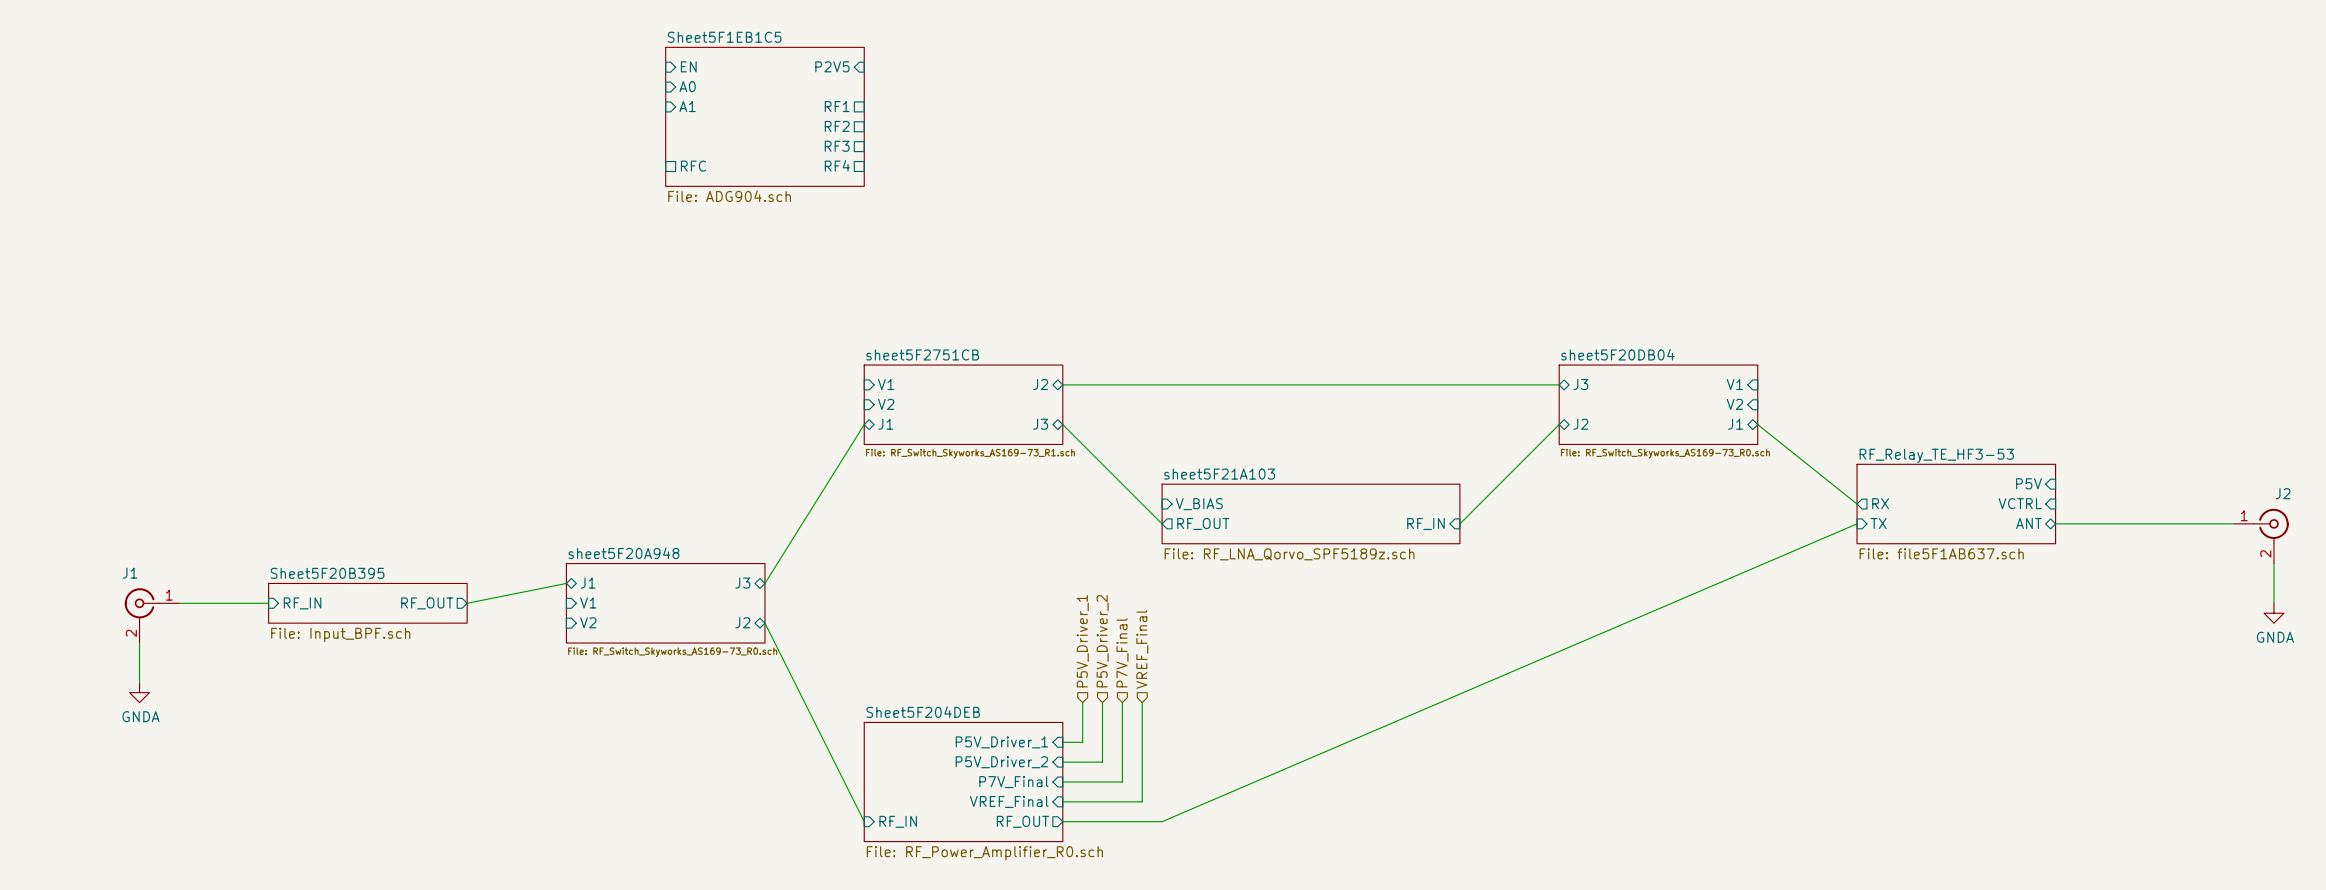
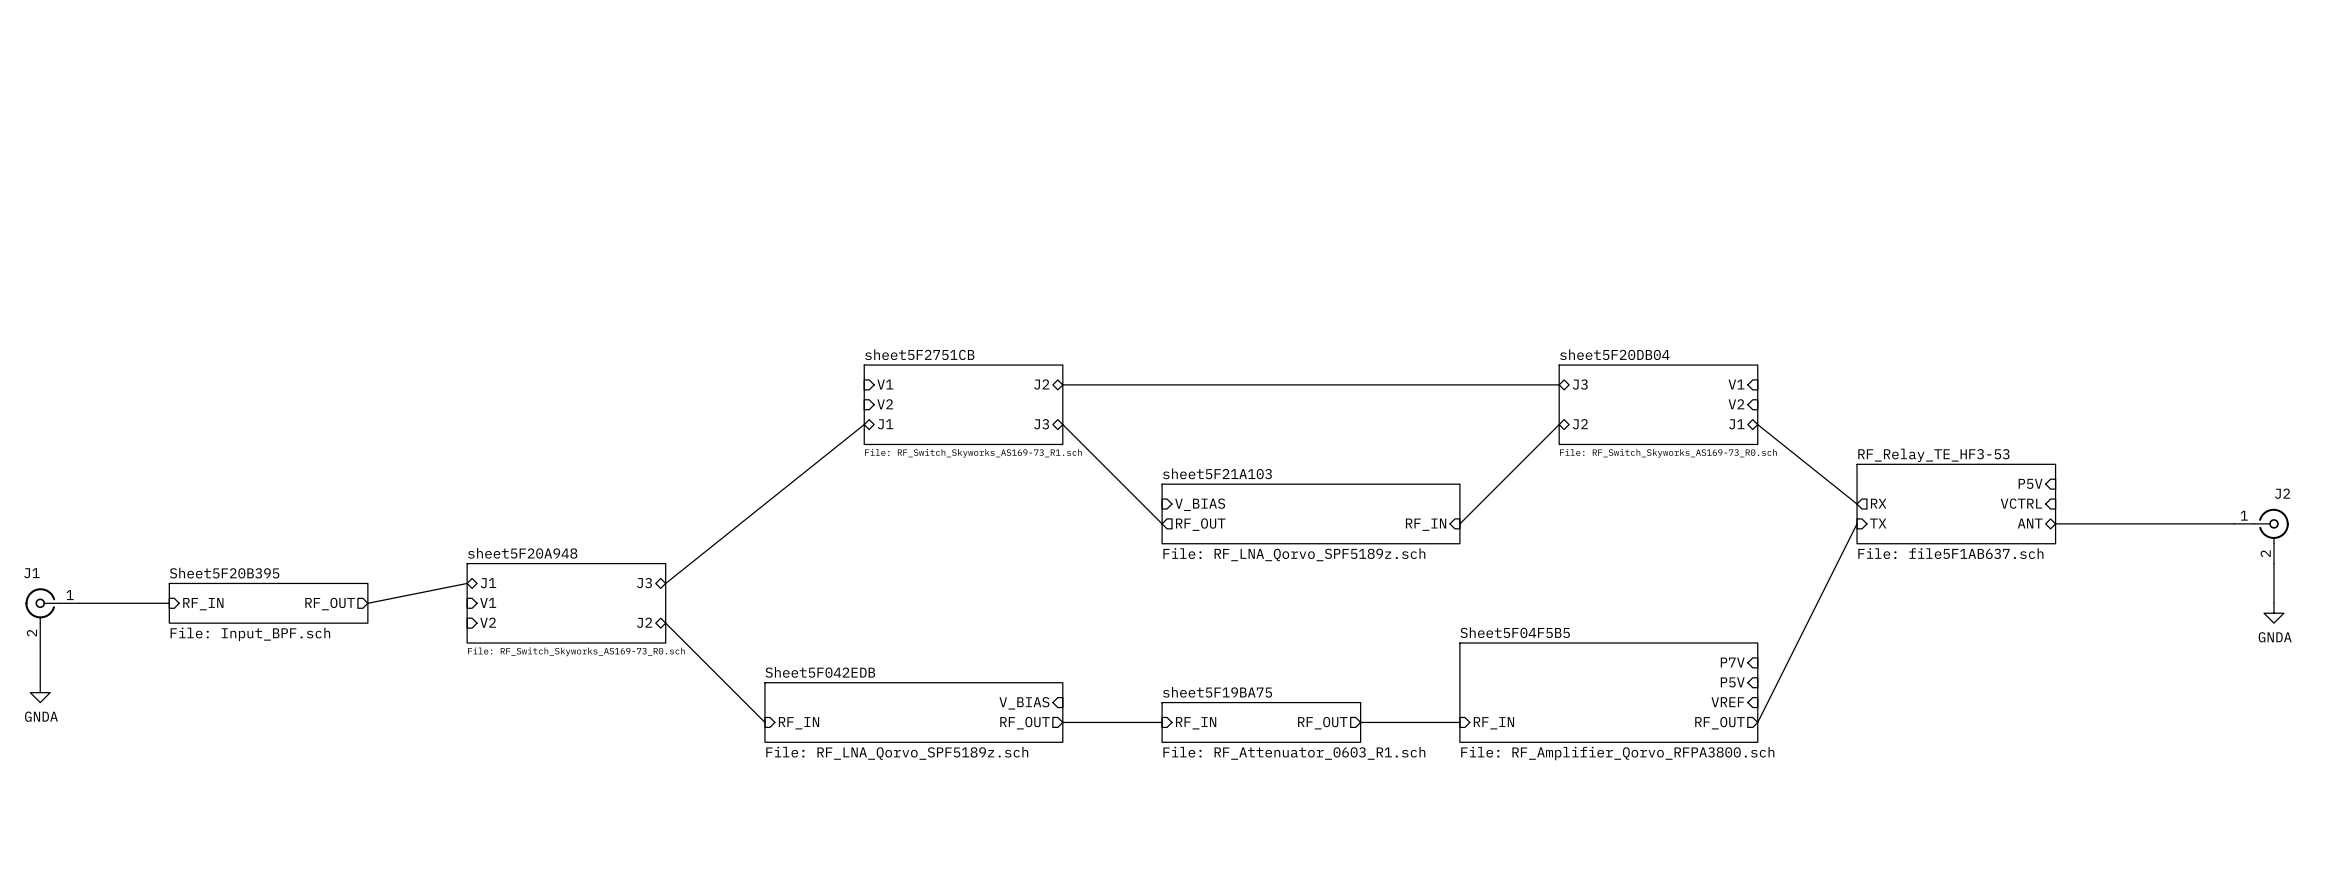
sheet pin: EN (688, 66) -> none
sheet pin: P2V5 (832, 66) -> none
sheet pin: A0 (687, 86) -> none
sheet pin: A1 (687, 106) -> none
sheet pin: RF1 (837, 106) -> none
sheet Sheet5F1EB1C5: File: ADG904.sch (764, 116) -> none
sheet pin: RF2 (837, 126) -> none
sheet pin: RF3 (837, 146) -> none
sheet pin: RF4 (837, 165) -> none
sheet pin: RFC (693, 166) -> none
wire: (864, 424) (764, 583) -> (864, 424) (665, 583)
wire: (1857, 523) (1162, 821) (1062, 821) -> (1857, 523) (1757, 722)
wire: (566, 583) (467, 603) -> (467, 583) (367, 603)
sheet pin position: J1 (588, 583) -> J1 (488, 583)
sheet pin position: J3 (742, 583) -> J3 (644, 583)
sheet pin position: V1 (588, 602) -> V1 (488, 602)
wire: (179, 603) (268, 603) -> (79, 603) (169, 603)
sheet pin position: RF_IN (302, 603) -> RF_IN (203, 604)
sheet Sheet5F20B395 position: (367, 603) -> (268, 603)
sheet pin position: RF_OUT (427, 603) -> RF_OUT (330, 604)
sheet sheet5F20A948 position: (665, 603) -> (566, 603)
J1 position: (151, 615) -> (52, 615)
sheet pin position: V2 (588, 622) -> V2 (488, 622)
sheet pin position: J2 (742, 622) -> J2 (644, 622)
wire: none -> (665, 623) (764, 722)
wire: (764, 623) (864, 821) -> none
hierarchical label: P5V_Driver_1 (1082, 641) -> none
hierarchical label: P5V_Driver_2 (1102, 641) -> none
wire: (139, 643) (139, 682) -> (40, 643) (40, 682)
hierarchical label: VREF_Final (1142, 649) -> none
hierarchical label: P7V_Final (1122, 652) -> none
sheet pin: none -> P7V (1732, 662)
sheet pin: none -> P5V (1732, 682)
power symbol position: GNDA (139, 692) -> GNDA (40, 692)
sheet Sheet5F04F5B5: none -> File: RF_Amplifier_Qorvo_RFPA3800.sch (1608, 692)
sheet pin: none -> V_BIAS (1024, 703)
wire: (1082, 702) (1082, 742) (1062, 742) -> none
wire: (1102, 702) (1102, 762) (1062, 762) -> none
wire: (1122, 702) (1122, 782) (1062, 782) -> none
wire: (1142, 702) (1142, 801) (1062, 801) -> none
sheet pin: none -> VREF (1727, 702)
sheet Sheet5F042EDB: none -> File: RF_LNA_Qorvo_SPF5189z.sch (913, 712)
wire: none -> (1062, 722) (1162, 722)
sheet pin: none -> RF_IN (1196, 723)
sheet sheet5F19BA75: none -> File: RF_Attenuator_0603_R1.sch (1261, 722)
sheet pin: none -> RF_OUT (1322, 723)
wire: none -> (1360, 722) (1459, 722)
sheet pin: none -> RF_IN (1493, 723)
sheet pin: none -> RF_OUT (1719, 723)
sheet pin: P5V_Driver_1 (1001, 742) -> none
sheet pin: P5V_Driver_2 (1001, 762) -> none
sheet Sheet5F204DEB: File: RF_Power_Amplifier_R0.sch (963, 782) -> none
sheet pin: P7V_Final (1013, 782) -> none
sheet pin: VREF_Final (1009, 801) -> none
sheet pin position: RF_IN (898, 821) -> RF_IN (798, 723)
sheet pin position: RF_OUT (1022, 821) -> RF_OUT (1025, 723)

